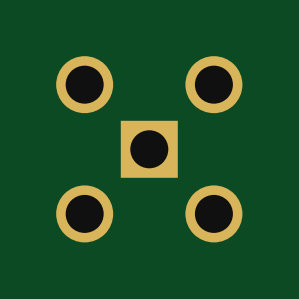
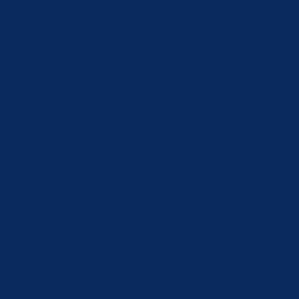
part: (149, 149) -> none

